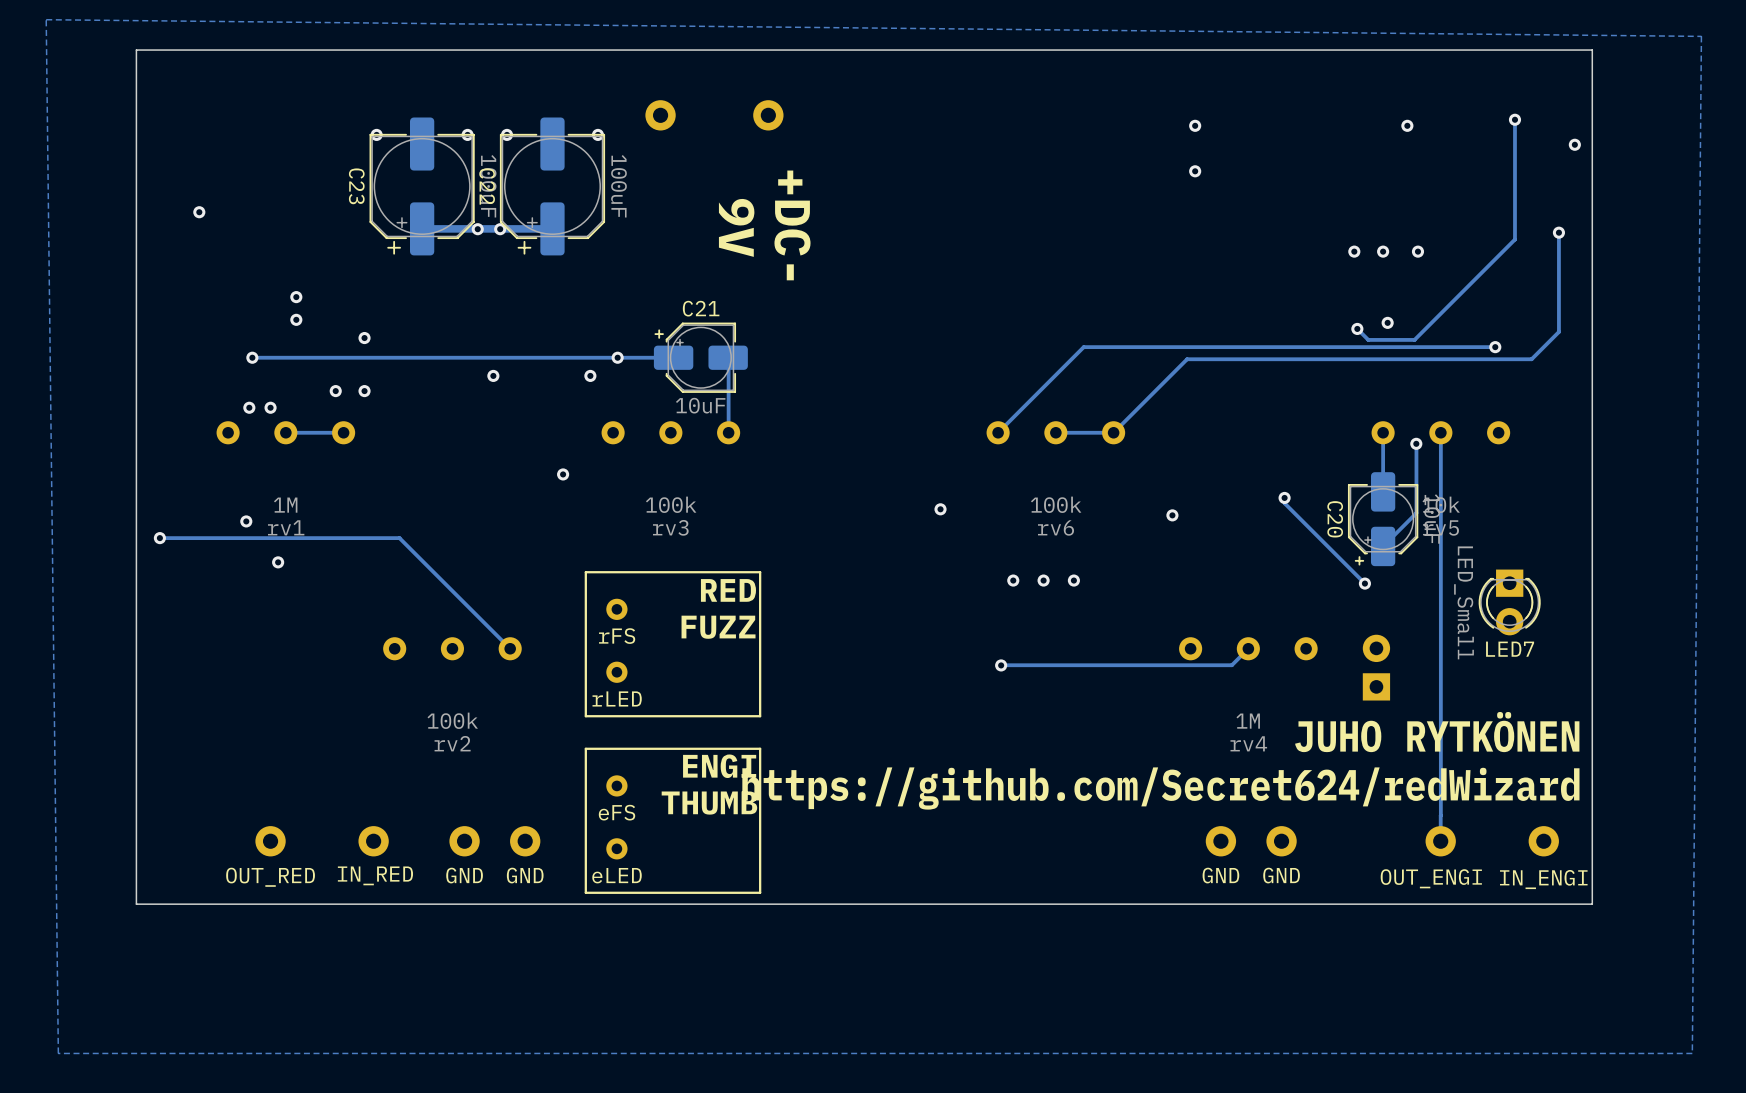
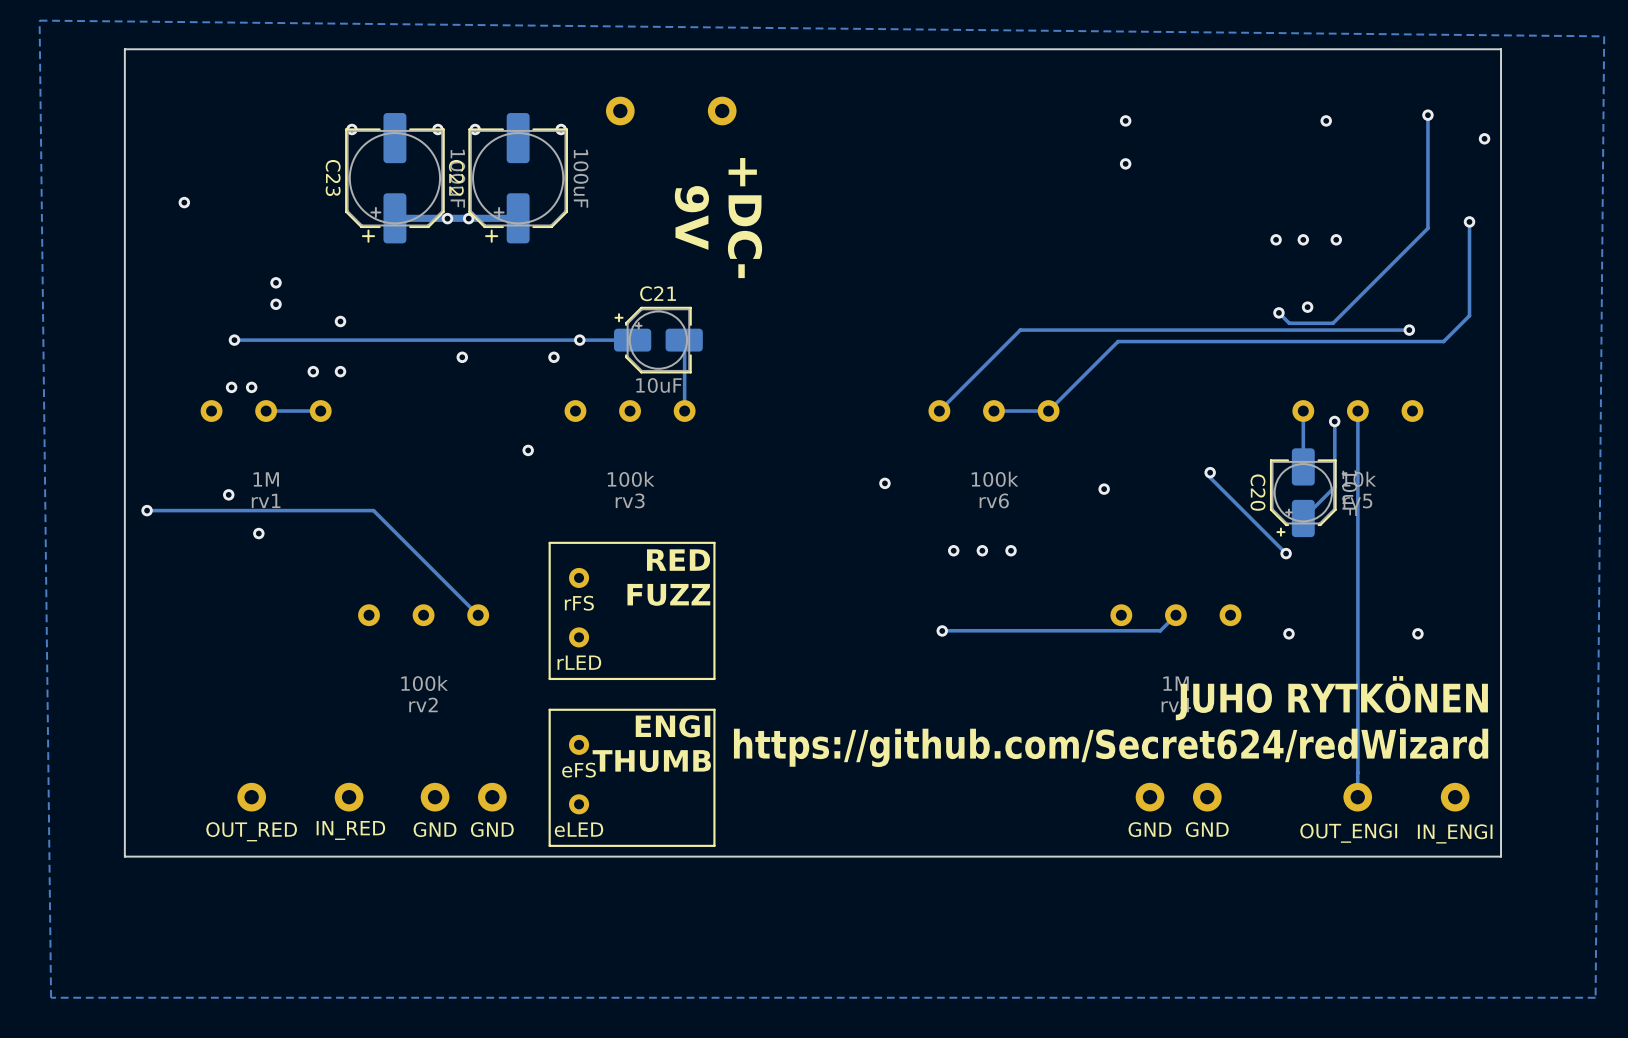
LED7: LED_Small (1509, 602) -> none
part: (1376, 667) -> none
via: none -> (1288, 633)
via: none -> (1417, 633)

